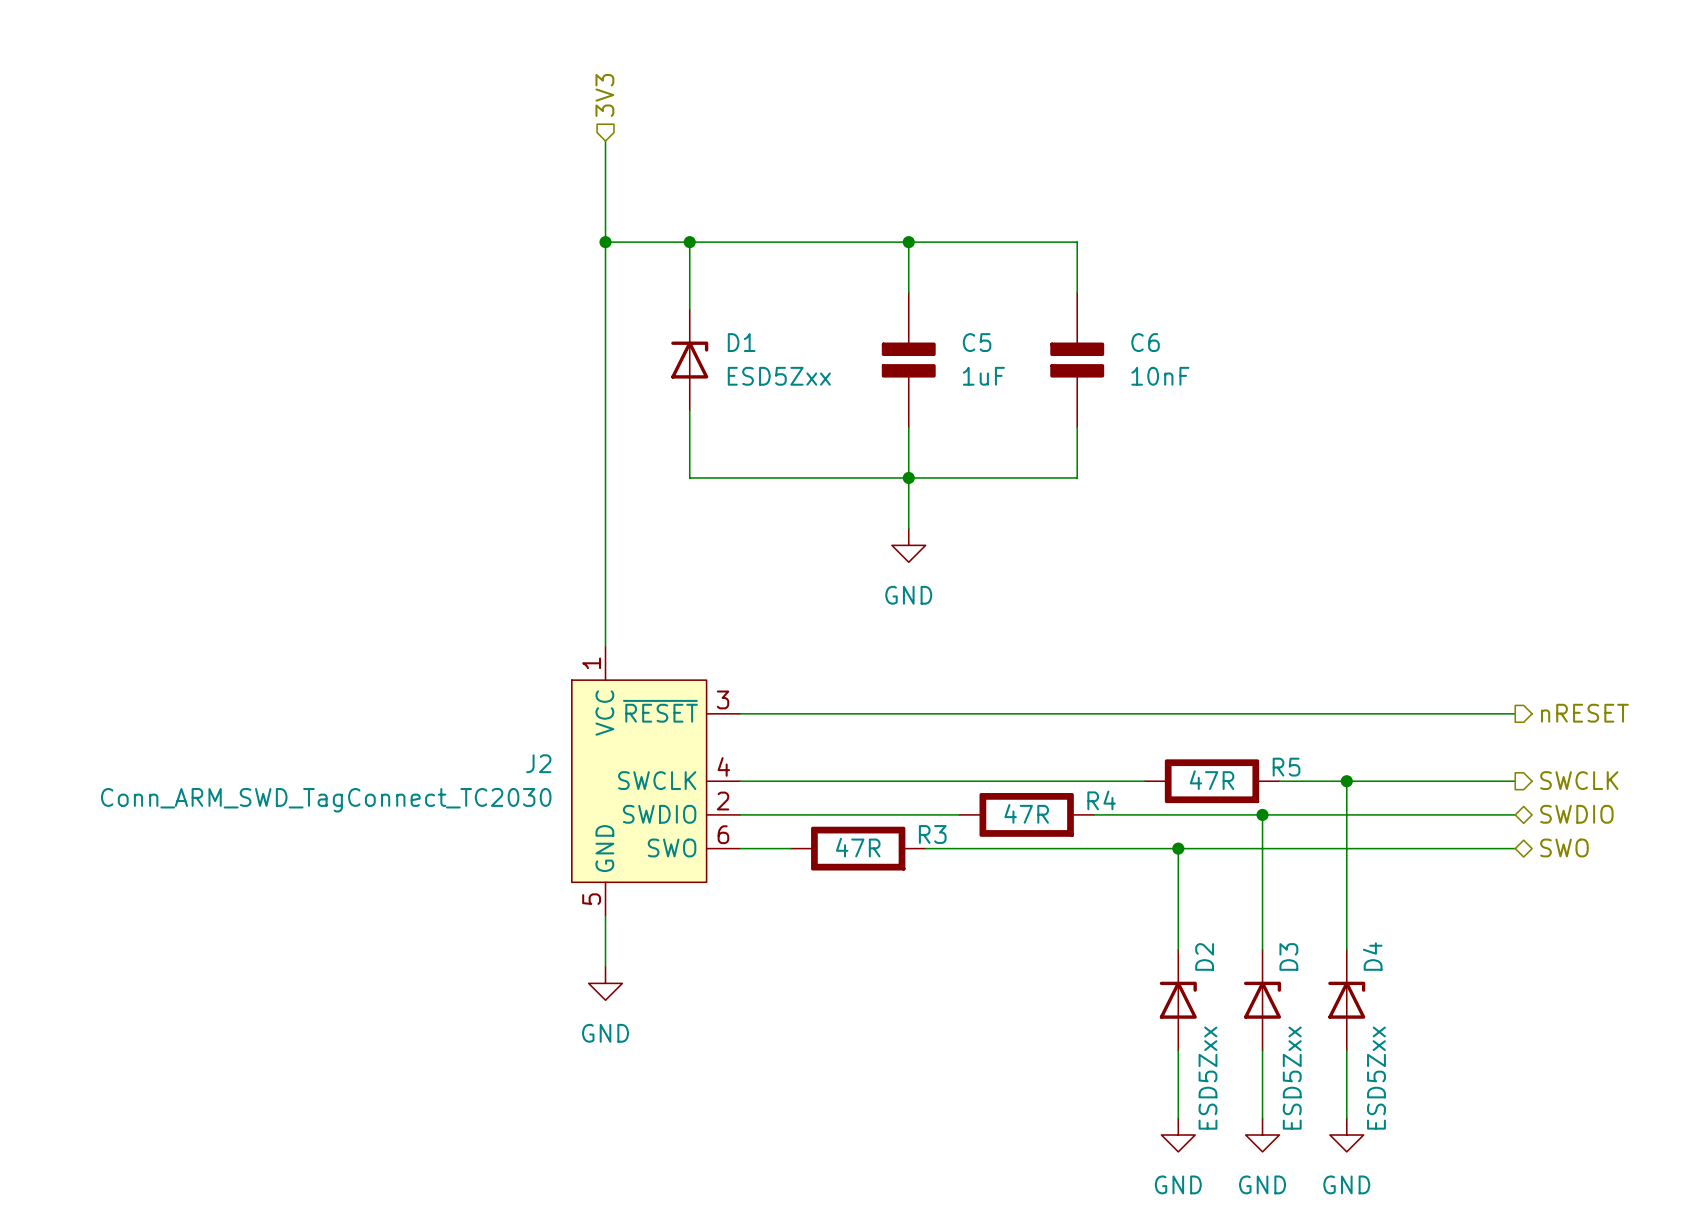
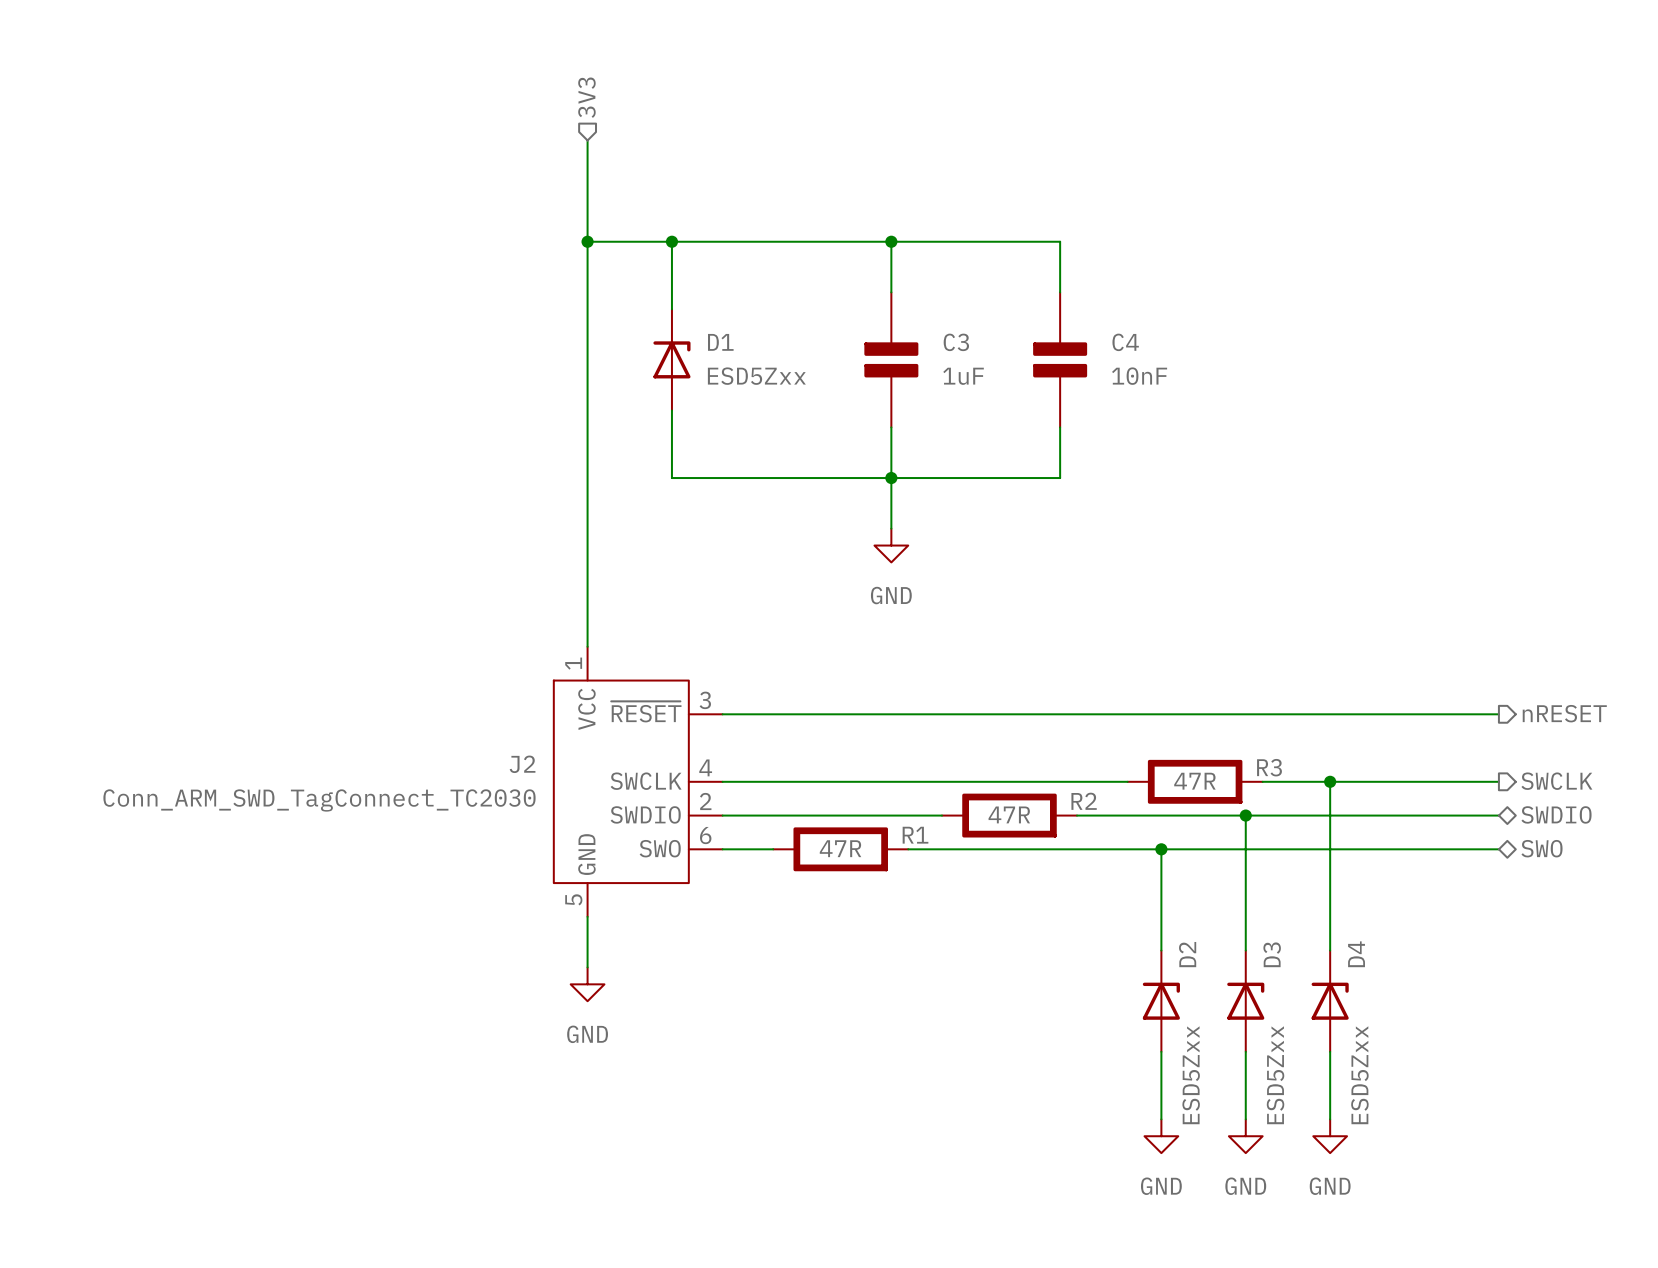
C5 name: C5 (977, 342) -> C3 (956, 342)
C6 name: C6 (1145, 342) -> C4 (1125, 342)
R5 name: R5 (1286, 767) -> R3 (1269, 767)
R4 name: R4 (1101, 800) -> R2 (1084, 801)
R3 name: R3 (932, 834) -> R1 (915, 835)

